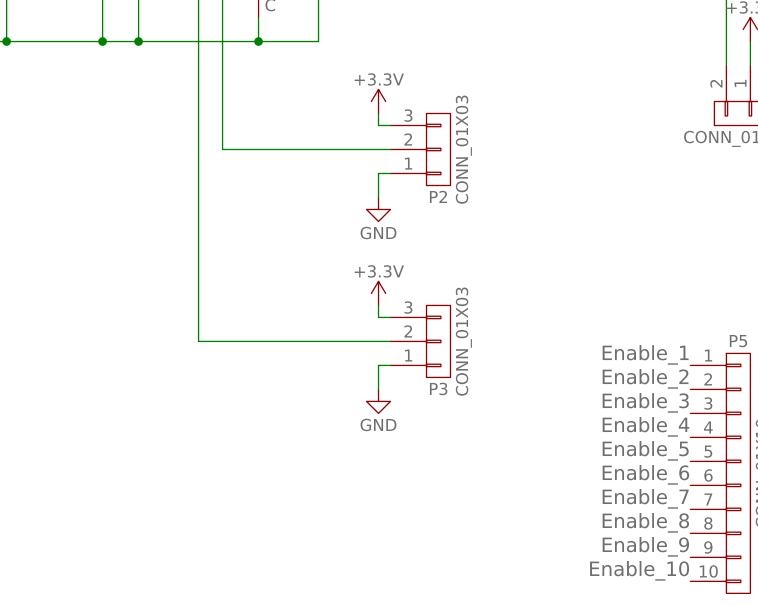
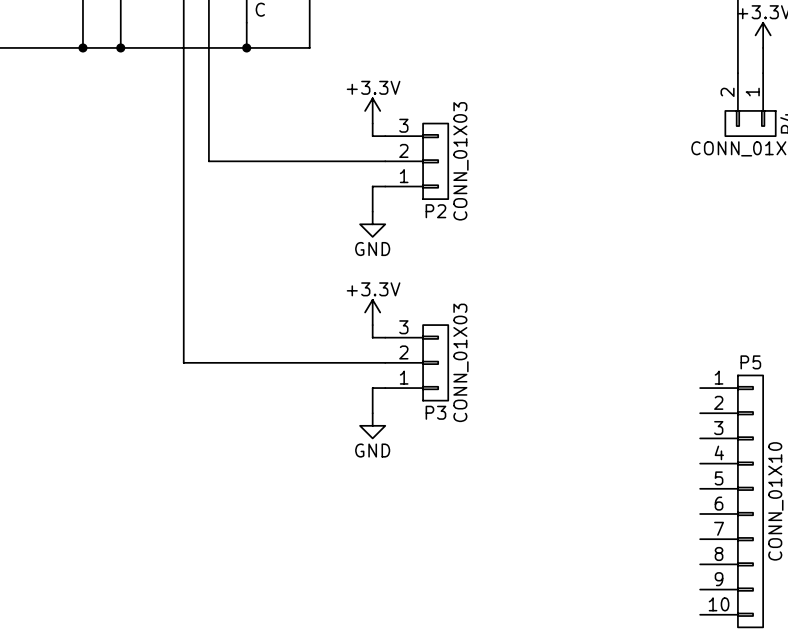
label: Enable_1 (645, 354) -> none
label: Enable_2 (645, 378) -> none
label: Enable_3 (645, 402) -> none
label: Enable_4 (645, 426) -> none
label: Enable_5 (645, 450) -> none
label: Enable_6 (645, 474) -> none
label: Enable_7 (645, 498) -> none
label: Enable_8 (645, 522) -> none
label: Enable_9 (645, 546) -> none
label: Enable_10 (639, 570) -> none

